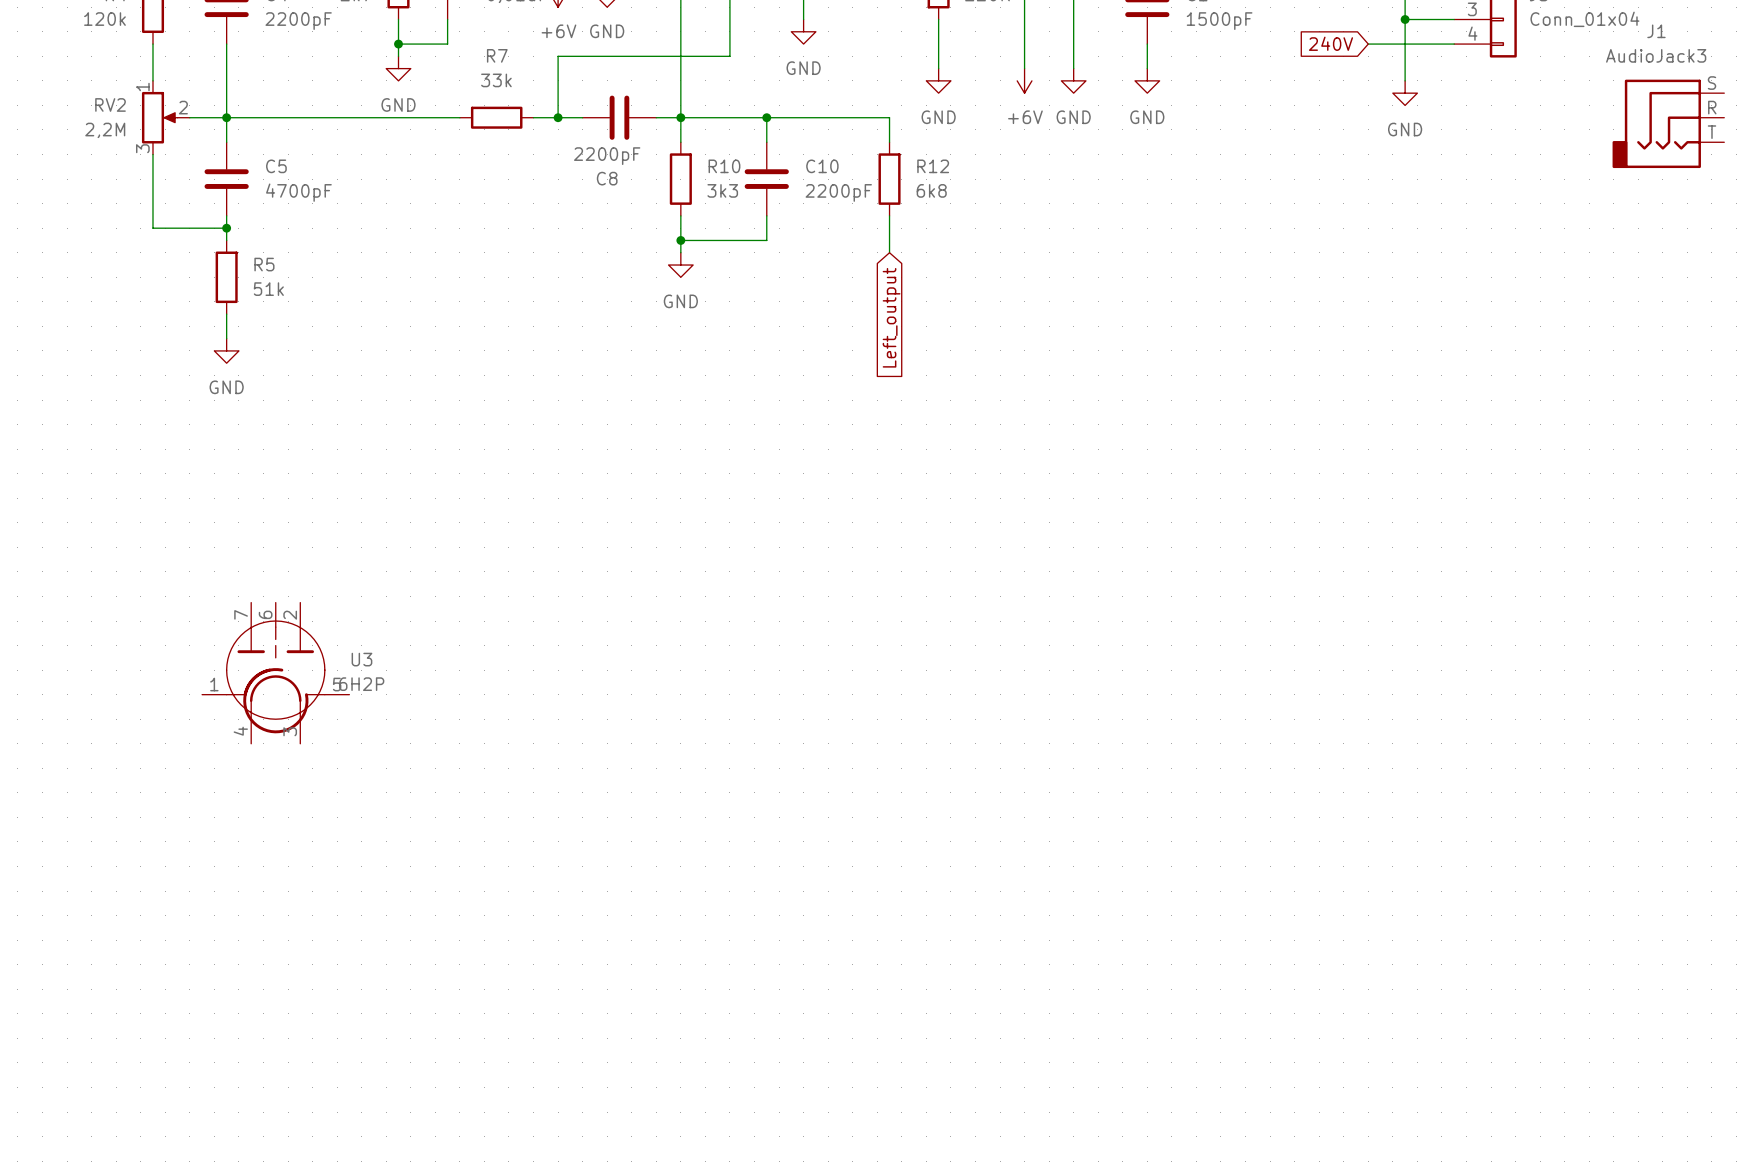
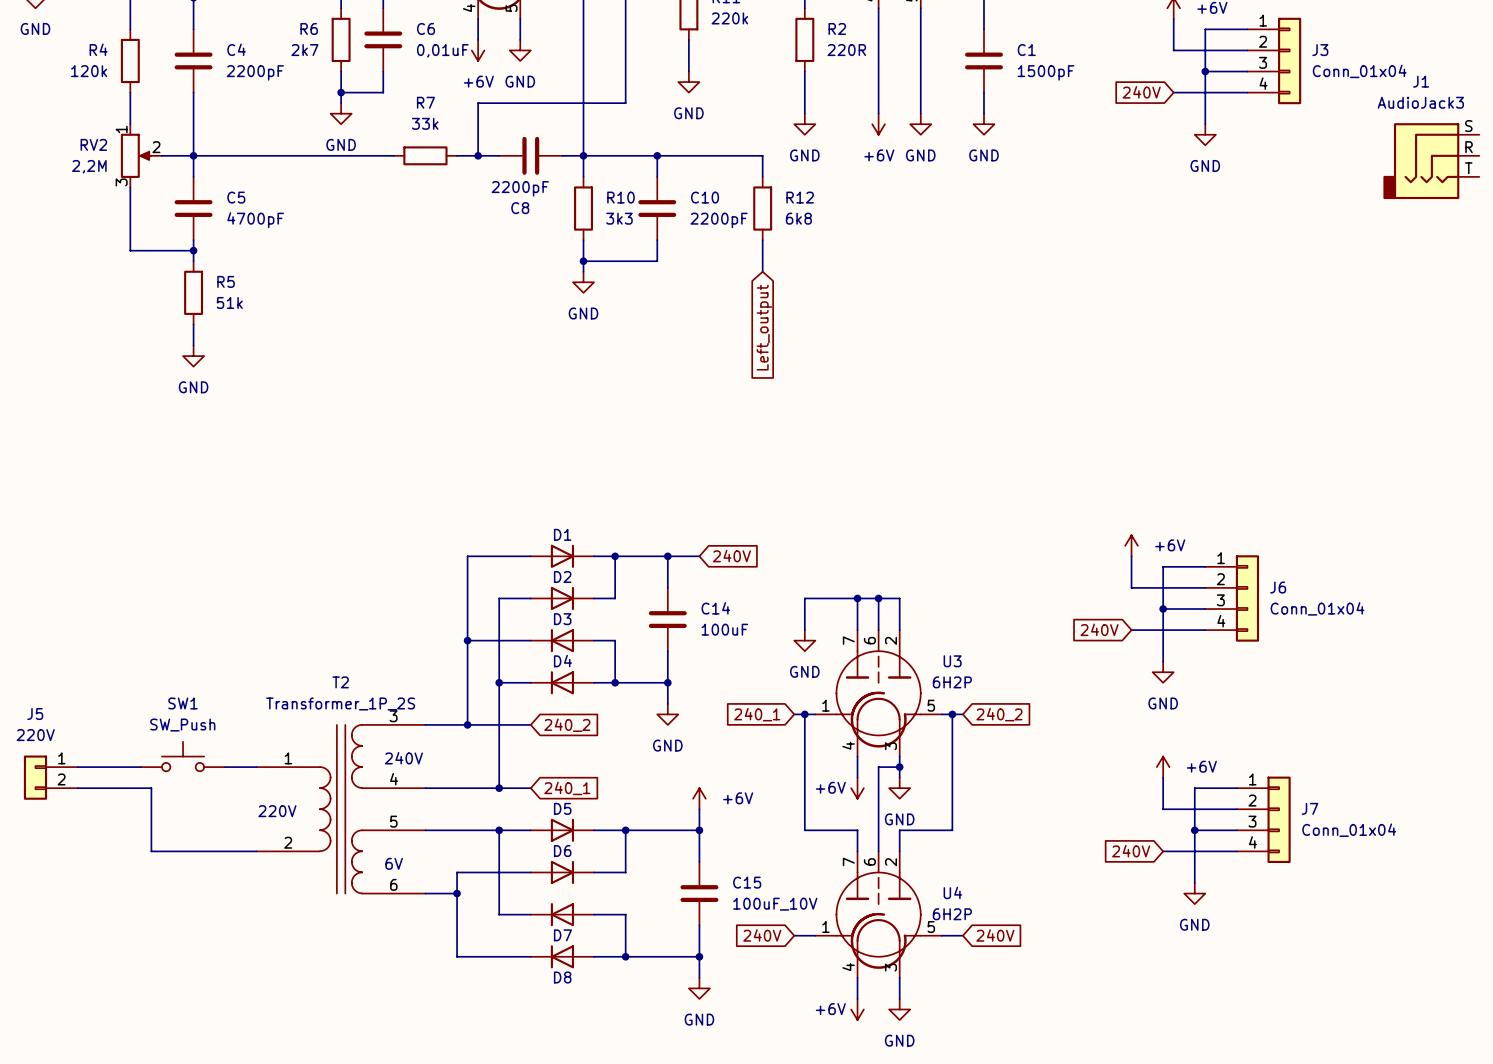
power symbol: none -> +6V (1131, 545)
global label: none -> 240V (731, 556)
wire: none -> (530, 556) (467, 556) (467, 724)
D1: none -> (562, 556)
wire: none -> (594, 556) (699, 556)
wire: none -> (615, 556) (615, 598) (594, 598)
junction: none -> (615, 556)
wire: none -> (667, 556) (667, 587)
junction: none -> (667, 556)
wire: none -> (1131, 556) (1131, 587) (1205, 587)
wire: none -> (1205, 566) (1163, 566) (1163, 661)
U3 symbol: [202, 602, 350, 744] -> [815, 630, 942, 757]
wire: none -> (530, 598) (499, 598) (499, 788)
D2: none -> (562, 598)
wire: none -> (857, 598) (857, 630)
junction: none -> (857, 598)
wire: none -> (878, 598) (878, 630)
junction: none -> (878, 598)
J6: none -> Conn_01x04 (1232, 598)
wire: none -> (1163, 609) (1205, 609)
junction: none -> (1163, 609)
C14: none -> 100uF (667, 619)
U3 name position: U3 (361, 659) -> U3 (952, 661)
global label: none -> 240V (1099, 629)
wire: none -> (804, 630) (804, 598) (899, 598) (899, 630)
wire: none -> (1131, 630) (1205, 630)
wire: none -> (467, 640) (530, 640)
junction: none -> (467, 640)
D3: none -> (562, 640)
wire: none -> (594, 640) (615, 640) (615, 682)
power symbol: none -> GND (804, 640)
U3 value position: 6H2P (361, 684) -> 6H2P (952, 682)
wire: none -> (667, 651) (667, 703)
power symbol: none -> GND (1163, 672)
wire: none -> (499, 682) (530, 682)
junction: none -> (499, 682)
D4: none -> (562, 682)
wire: none -> (594, 682) (667, 682)
junction: none -> (615, 682)
junction: none -> (667, 682)
power symbol: none -> GND (667, 714)
global label: none -> 240_1 (757, 714)
wire: none -> (794, 714) (815, 714)
wire: none -> (804, 714) (804, 830) (857, 830) (857, 851)
junction: none -> (804, 714)
wire: none -> (941, 714) (962, 714)
wire: none -> (952, 714) (952, 830) (899, 830) (899, 851)
junction: none -> (952, 714)
global label: none -> 240_2 (999, 714)
wire: none -> (425, 724) (530, 724)
junction: none -> (467, 724)
global label: none -> 240_2 (567, 725)
SW1: none -> SW_Push (183, 756)
wire: none -> (857, 756) (857, 777)
wire: none -> (899, 756) (899, 777)
text: none -> 240V (403, 758)
wire: none -> (77, 767) (140, 767)
wire: none -> (225, 767) (256, 767)
wire: none -> (899, 767) (878, 767) (878, 851)
junction: none -> (899, 767)
power symbol: none -> +6V (1163, 767)
J5: none -> 220V (50, 777)
wire: none -> (1163, 777) (1163, 809) (1236, 809)
wire: none -> (77, 788) (151, 788) (151, 851) (256, 851)
wire: none -> (425, 788) (530, 788)
junction: none -> (499, 788)
global label: none -> 240_1 (567, 788)
power symbol: none -> +6V (857, 788)
power symbol: none -> GND (899, 788)
wire: none -> (1236, 788) (1194, 788) (1194, 883)
power symbol: none -> +6V (699, 798)
T2: none -> Transformer_1P_2S (341, 809)
wire: none -> (699, 809) (699, 861)
text: none -> 220V (277, 811)
J7: none -> Conn_01x04 (1263, 819)
wire: none -> (425, 830) (530, 830)
wire: none -> (499, 830) (499, 914) (530, 914)
junction: none -> (499, 830)
D5: none -> (562, 830)
wire: none -> (594, 830) (699, 830)
wire: none -> (625, 830) (625, 872) (594, 872)
junction: none -> (625, 830)
junction: none -> (699, 830)
wire: none -> (1194, 830) (1236, 830)
junction: none -> (1194, 830)
global label: none -> 240V (1131, 851)
wire: none -> (1163, 851) (1236, 851)
text: none -> 6V (394, 863)
wire: none -> (530, 872) (457, 872) (457, 956) (530, 956)
D6: none -> (562, 872)
wire: none -> (425, 893) (457, 893)
junction: none -> (457, 893)
C15: none -> 100uF_10V (699, 893)
power symbol: none -> GND (1194, 893)
D7: none -> (562, 914)
wire: none -> (594, 914) (625, 914) (625, 956)
U4: none -> 6H2P (878, 914)
wire: none -> (699, 925) (699, 977)
global label: none -> 240V (762, 935)
global label: none -> 240V (995, 935)
wire: none -> (794, 935) (815, 935)
wire: none -> (941, 935) (962, 935)
D8: none -> (562, 956)
wire: none -> (594, 956) (699, 956)
junction: none -> (625, 956)
junction: none -> (699, 956)
wire: none -> (857, 977) (857, 998)
wire: none -> (899, 977) (899, 998)
power symbol: none -> GND (699, 988)
power symbol: none -> +6V (857, 1009)
power symbol: none -> GND (899, 1009)

